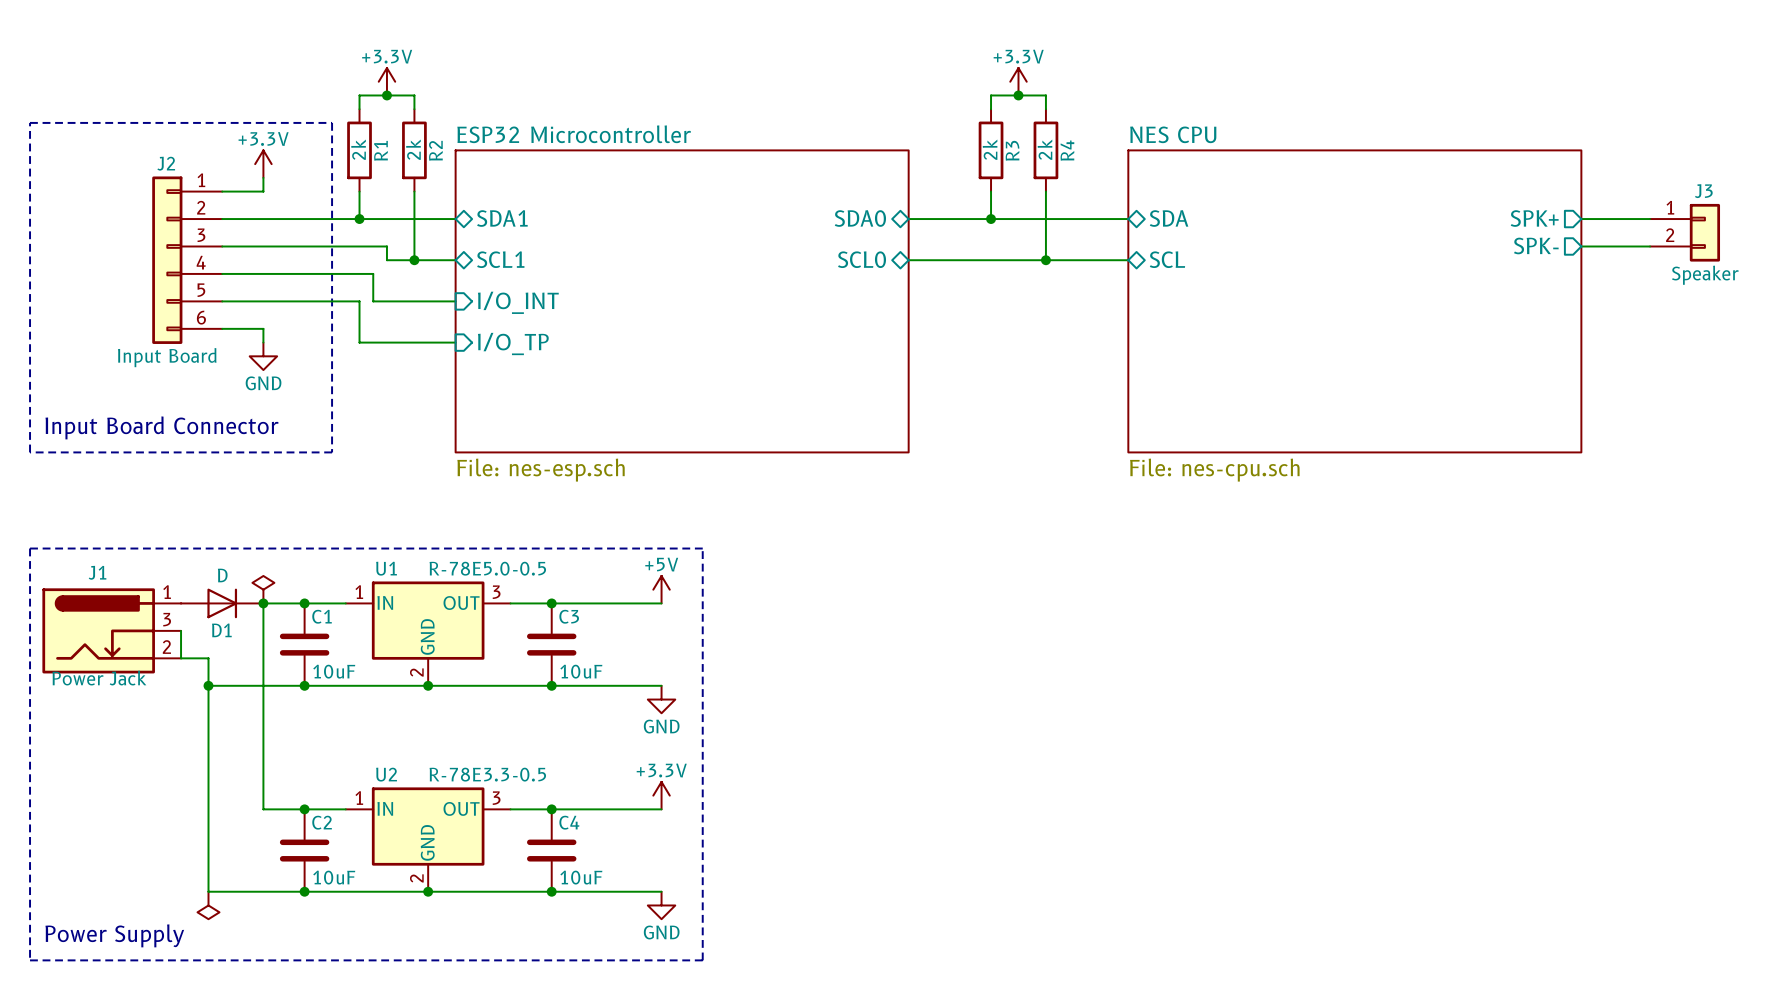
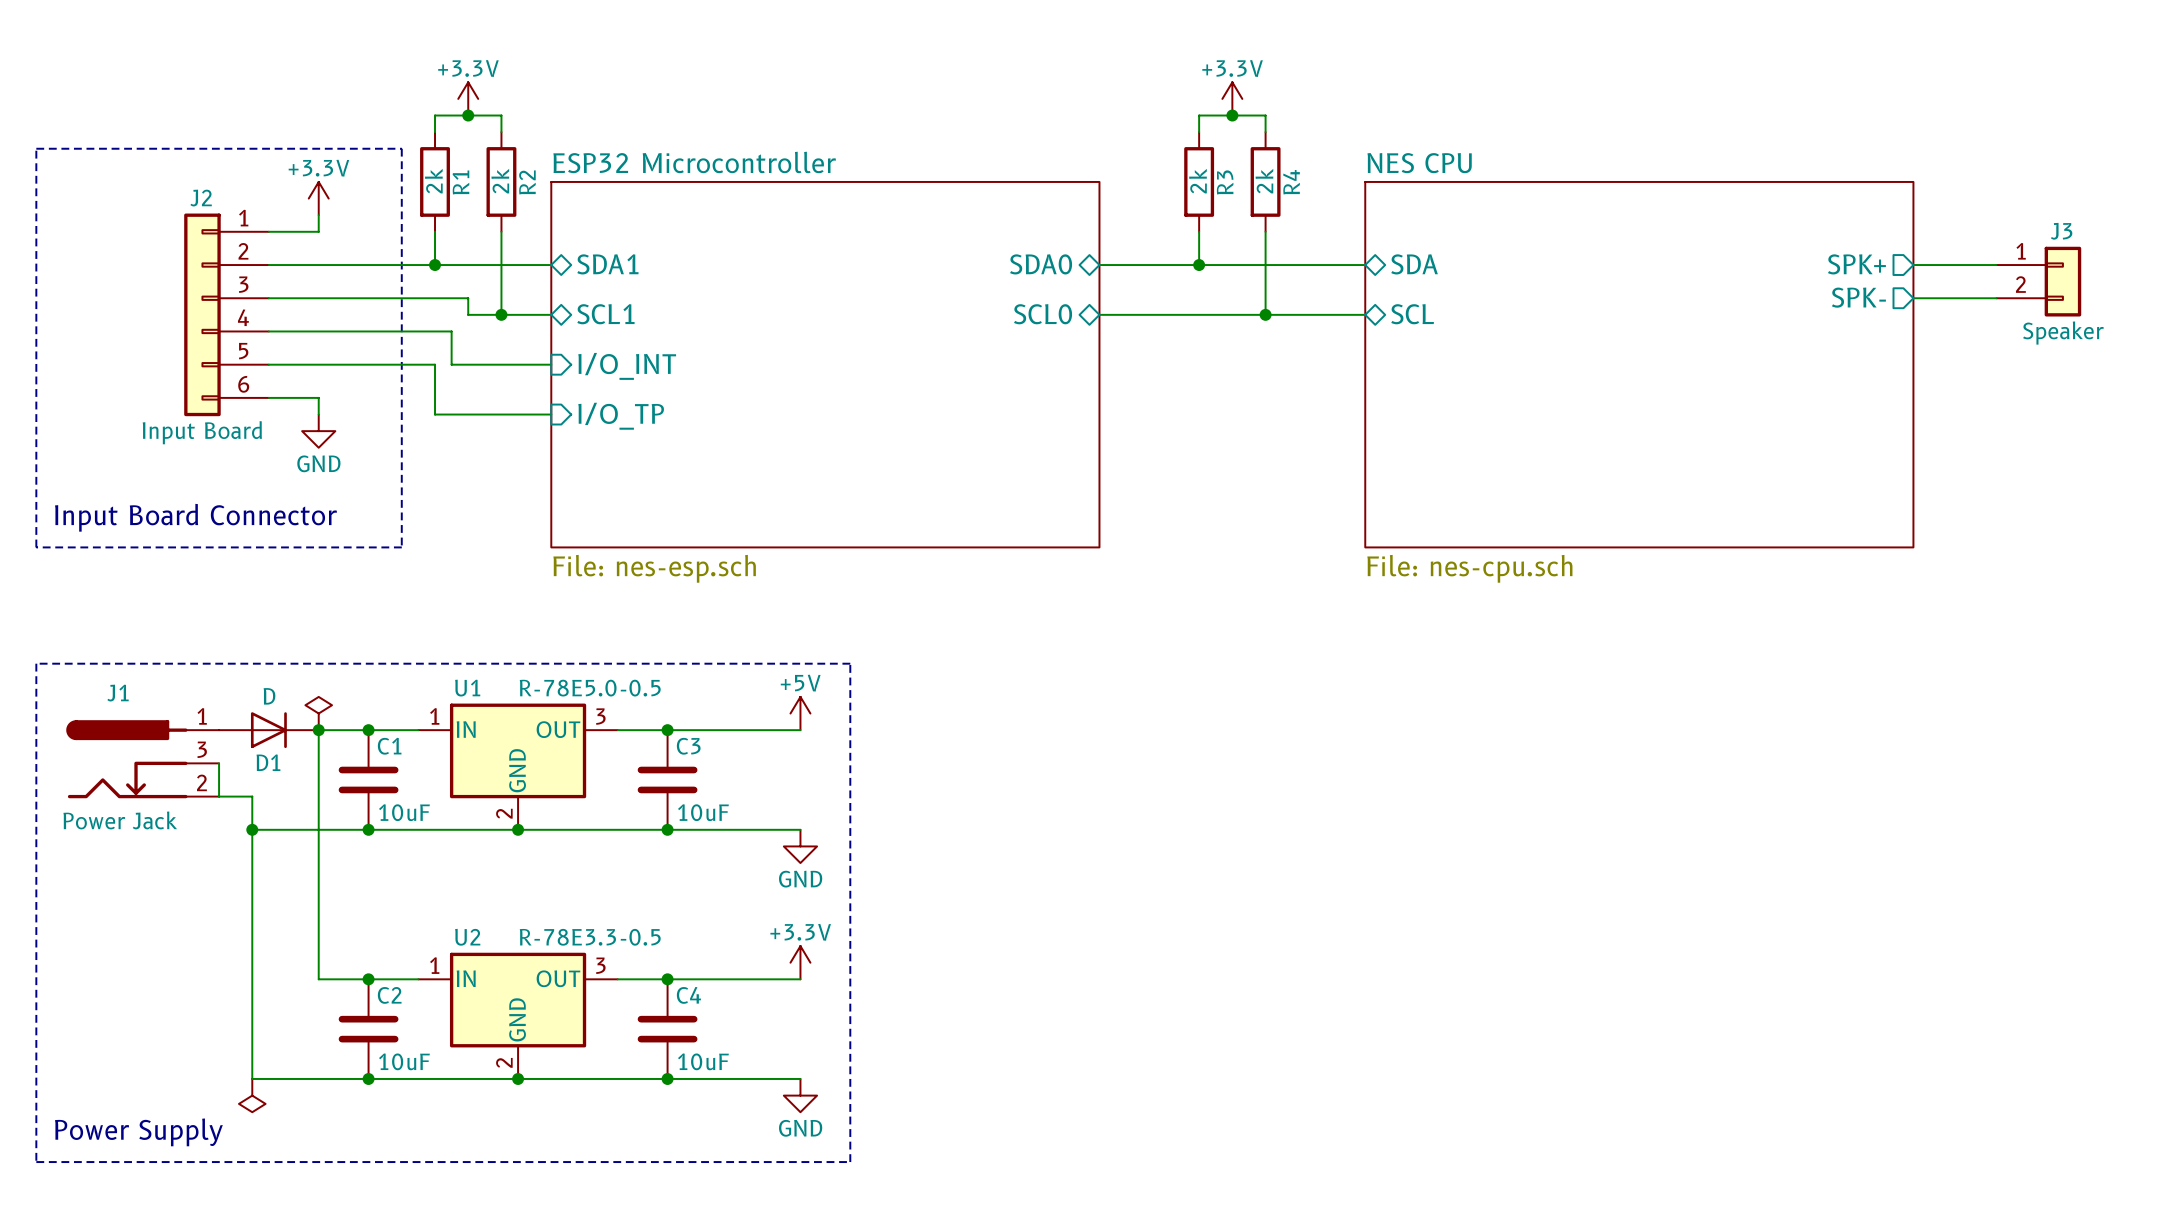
J1 symbol: [42, 588, 182, 674] -> [66, 720, 220, 799]

